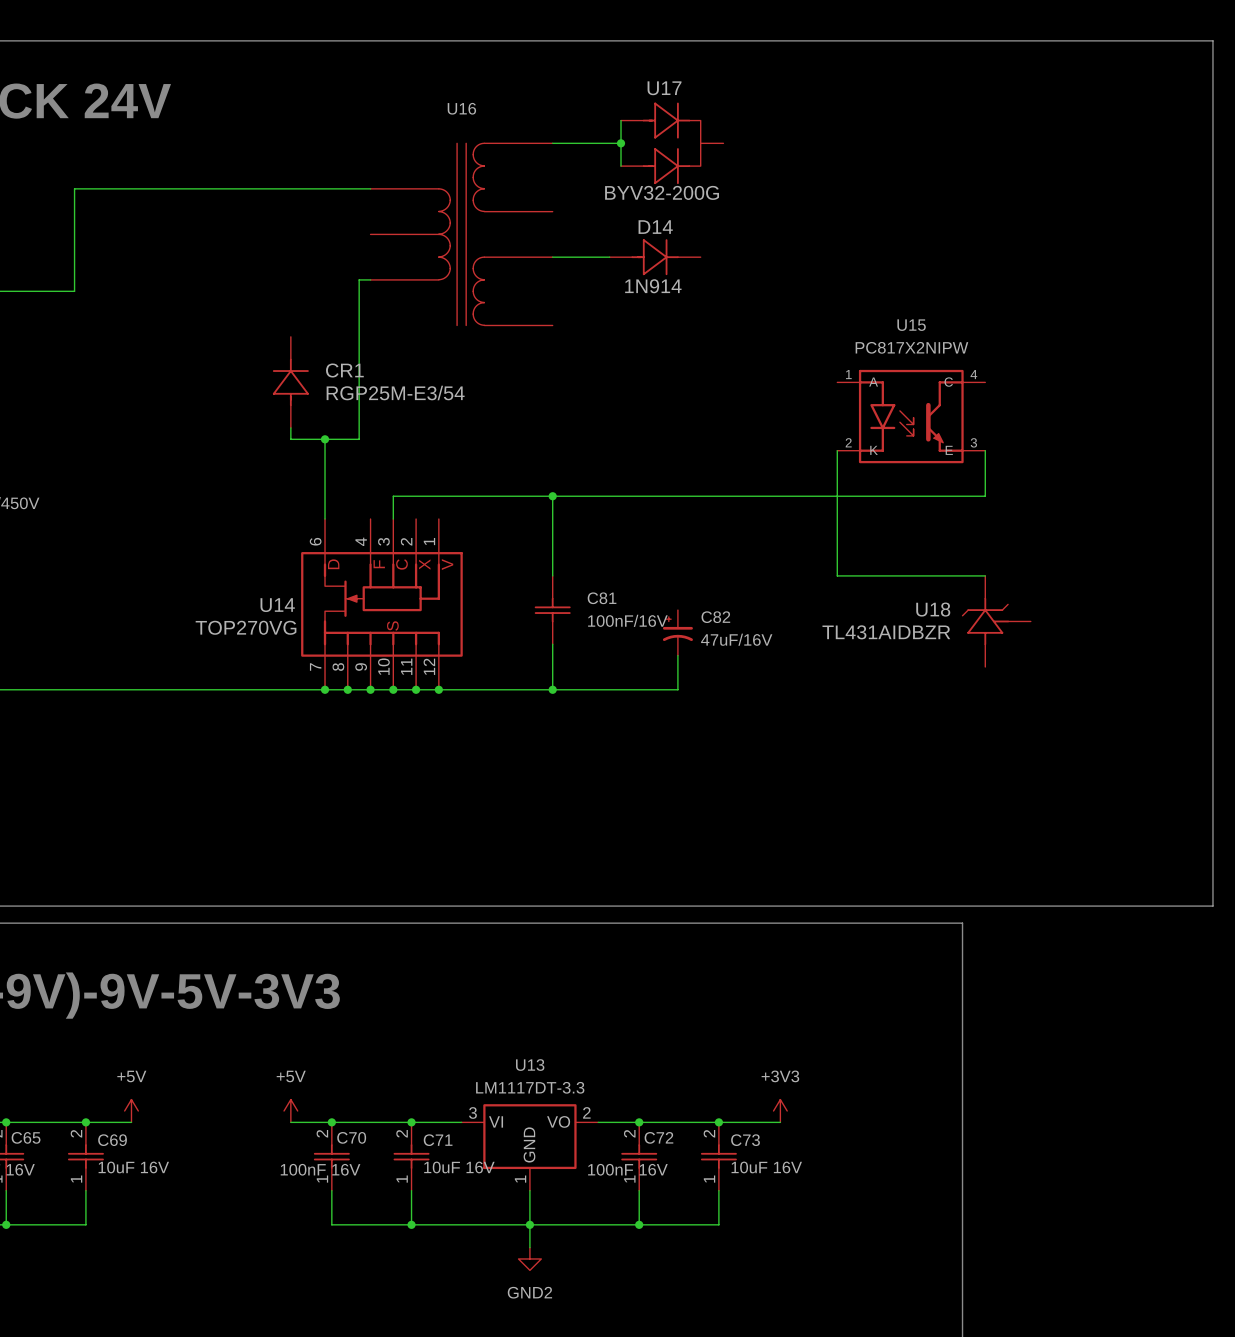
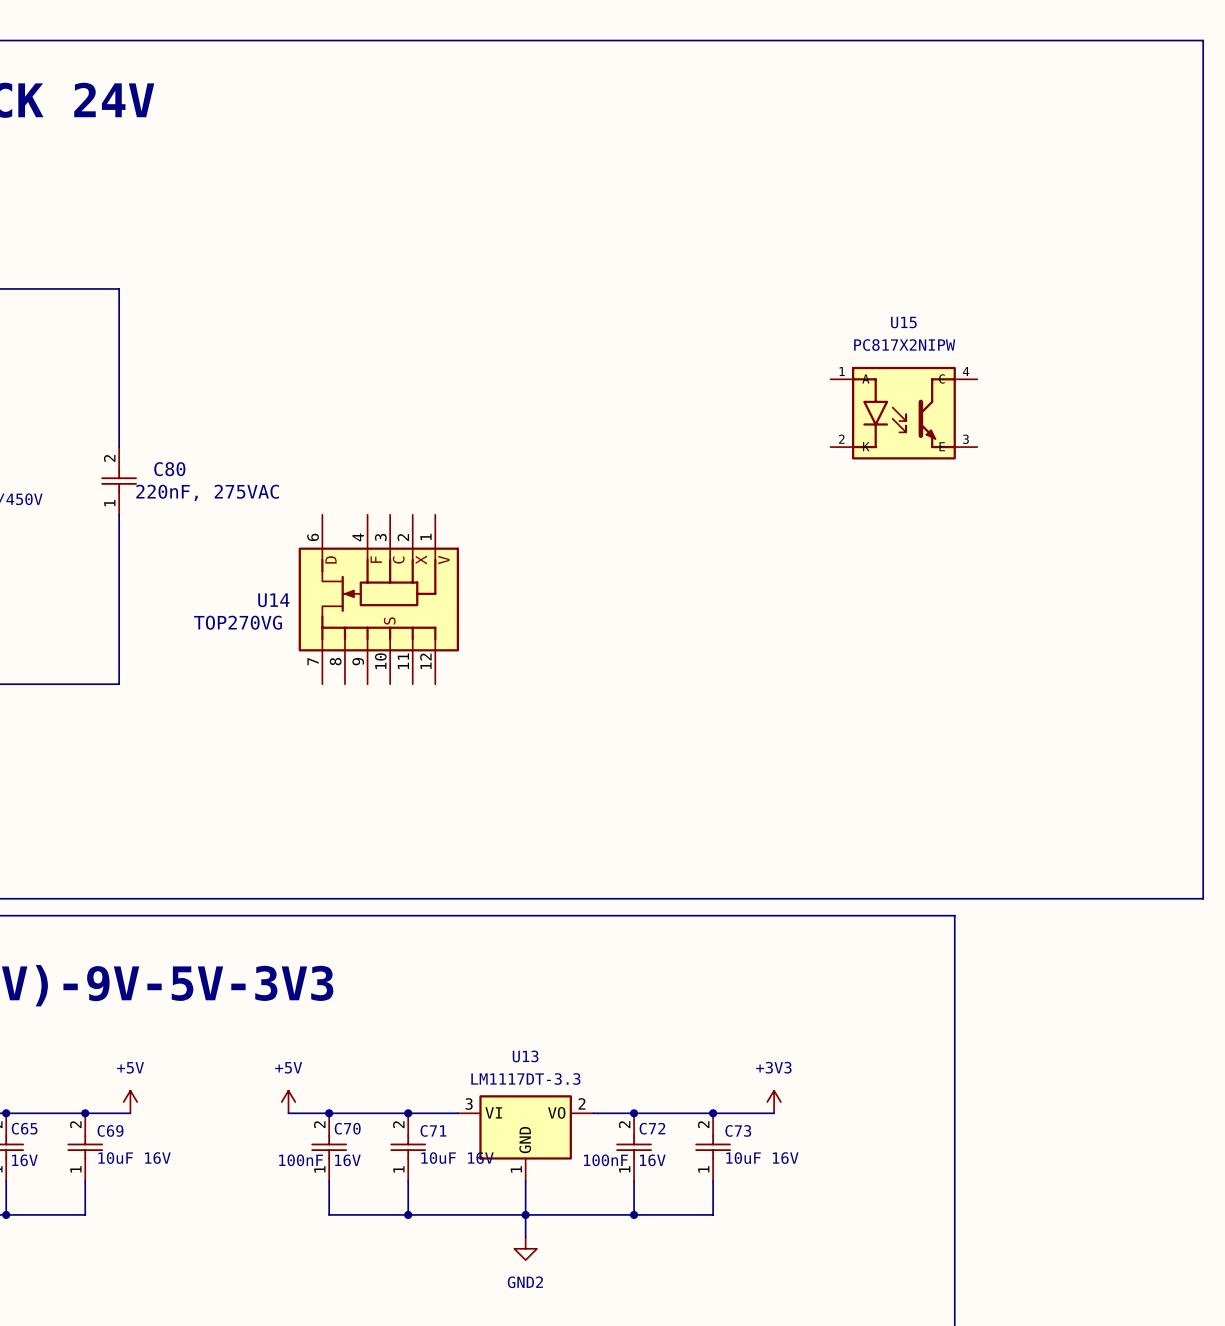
wire: (621, 120) (621, 166) -> none
wire: (552, 143) (621, 143) -> none
junction: (621, 143) -> none
U17: BYV32-200G (672, 143) -> none
wire: (370, 188) (74, 188) (74, 291) -> (119, 447) (119, 288) (73, 288)
U16: (461, 234) -> none
wire: (552, 257) (609, 257) -> none
D14: 1N914 (655, 257) -> none
wire: (370, 279) (359, 279) (359, 439) (290, 439) (290, 427) -> none
CR1: RGP25M-E3/54 (290, 382) -> none
wire: (325, 439) (325, 519) -> none
junction: (325, 439) -> none
wire: (837, 450) (837, 575) (985, 575) -> none
wire: (985, 450) (985, 496) (393, 496) (393, 519) -> none
C80: none -> 220nF, 275VAC (119, 480)
wire: (552, 496) (552, 575) -> none
junction: (552, 496) -> none
C81: 100nF/16V (552, 610) -> none
U18: TL431AIDBZR (996, 621) -> none
C82: 47uF/16V (677, 632) -> none
wire: (552, 644) (552, 689) -> none
wire: (677, 655) (677, 689) (120, 689) -> (119, 514) (119, 684)
junction: (325, 689) -> none
junction: (347, 689) -> none
junction: (370, 689) -> none
junction: (393, 689) -> none
junction: (416, 689) -> none
junction: (438, 689) -> none
junction: (552, 689) -> none

